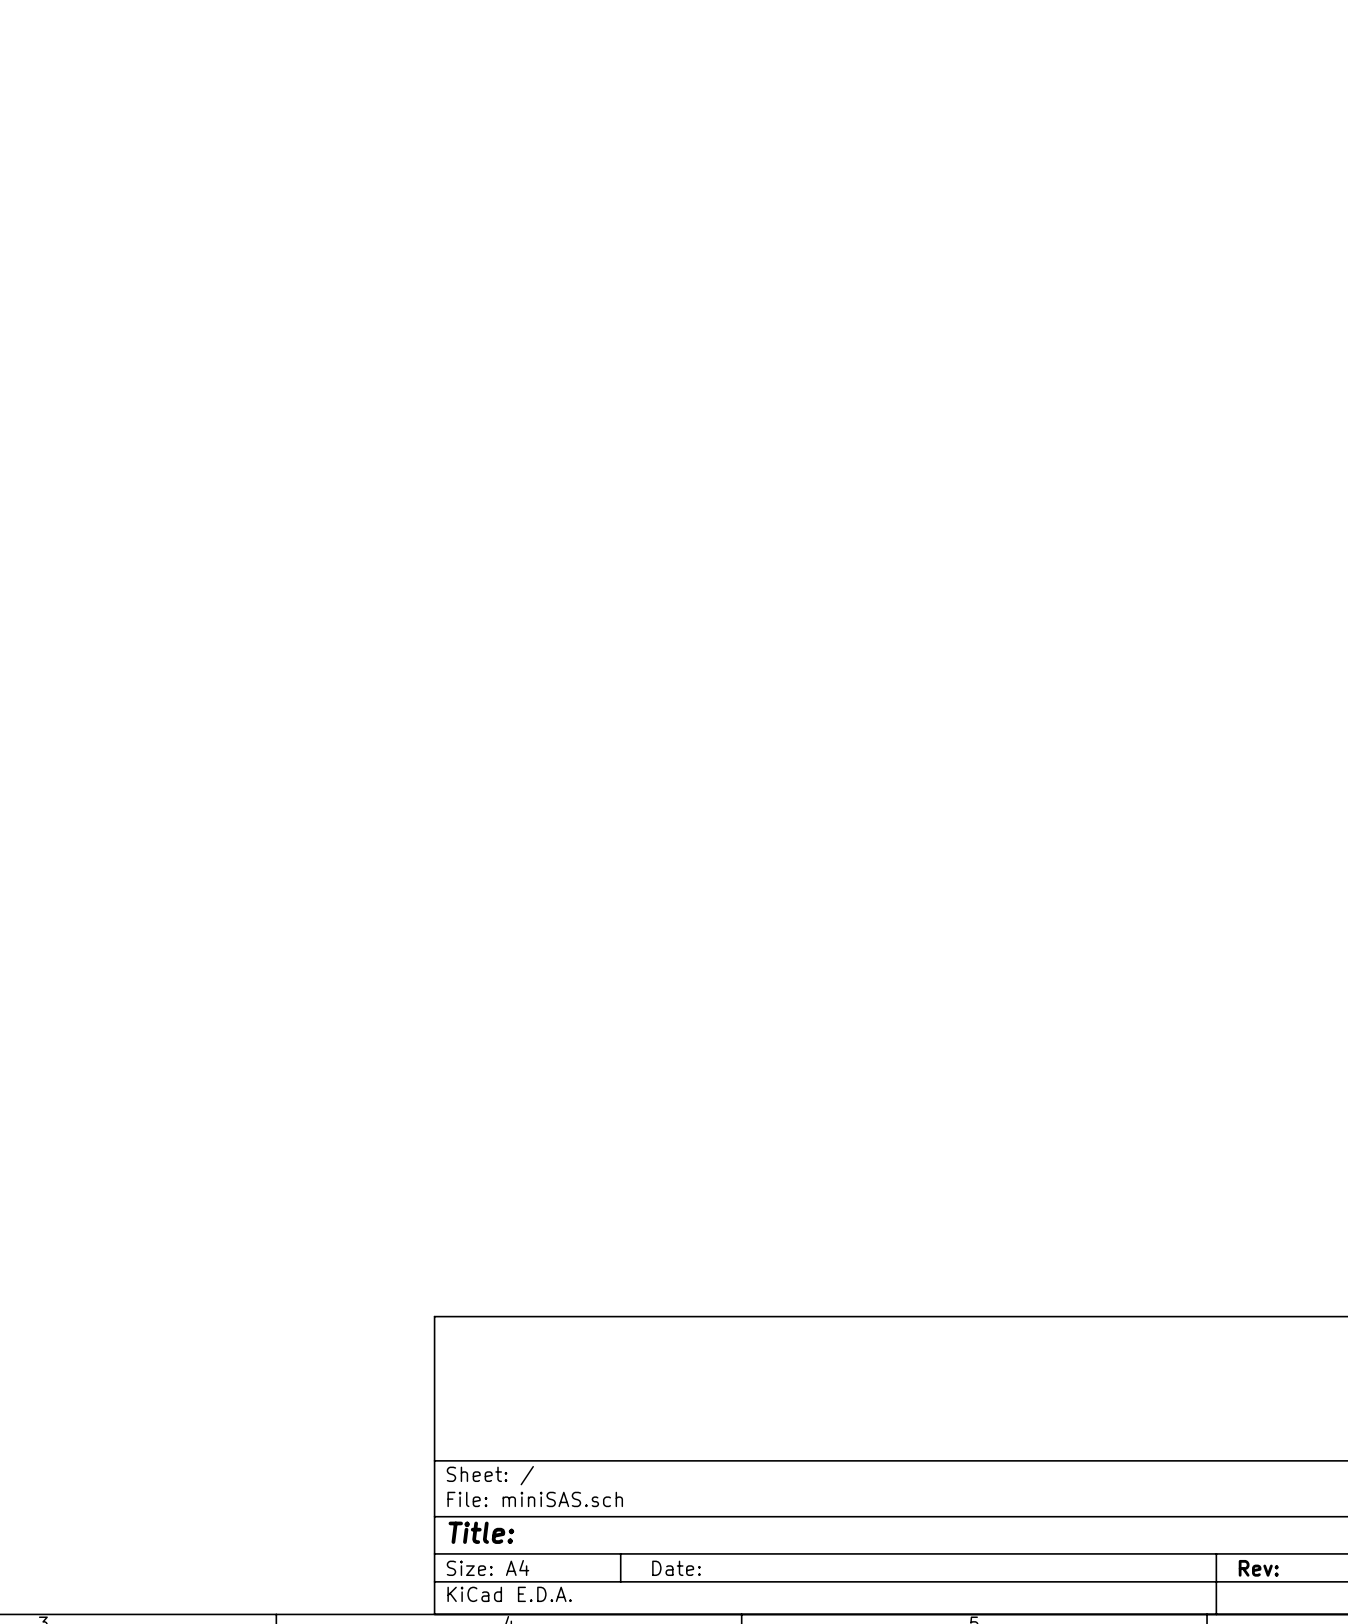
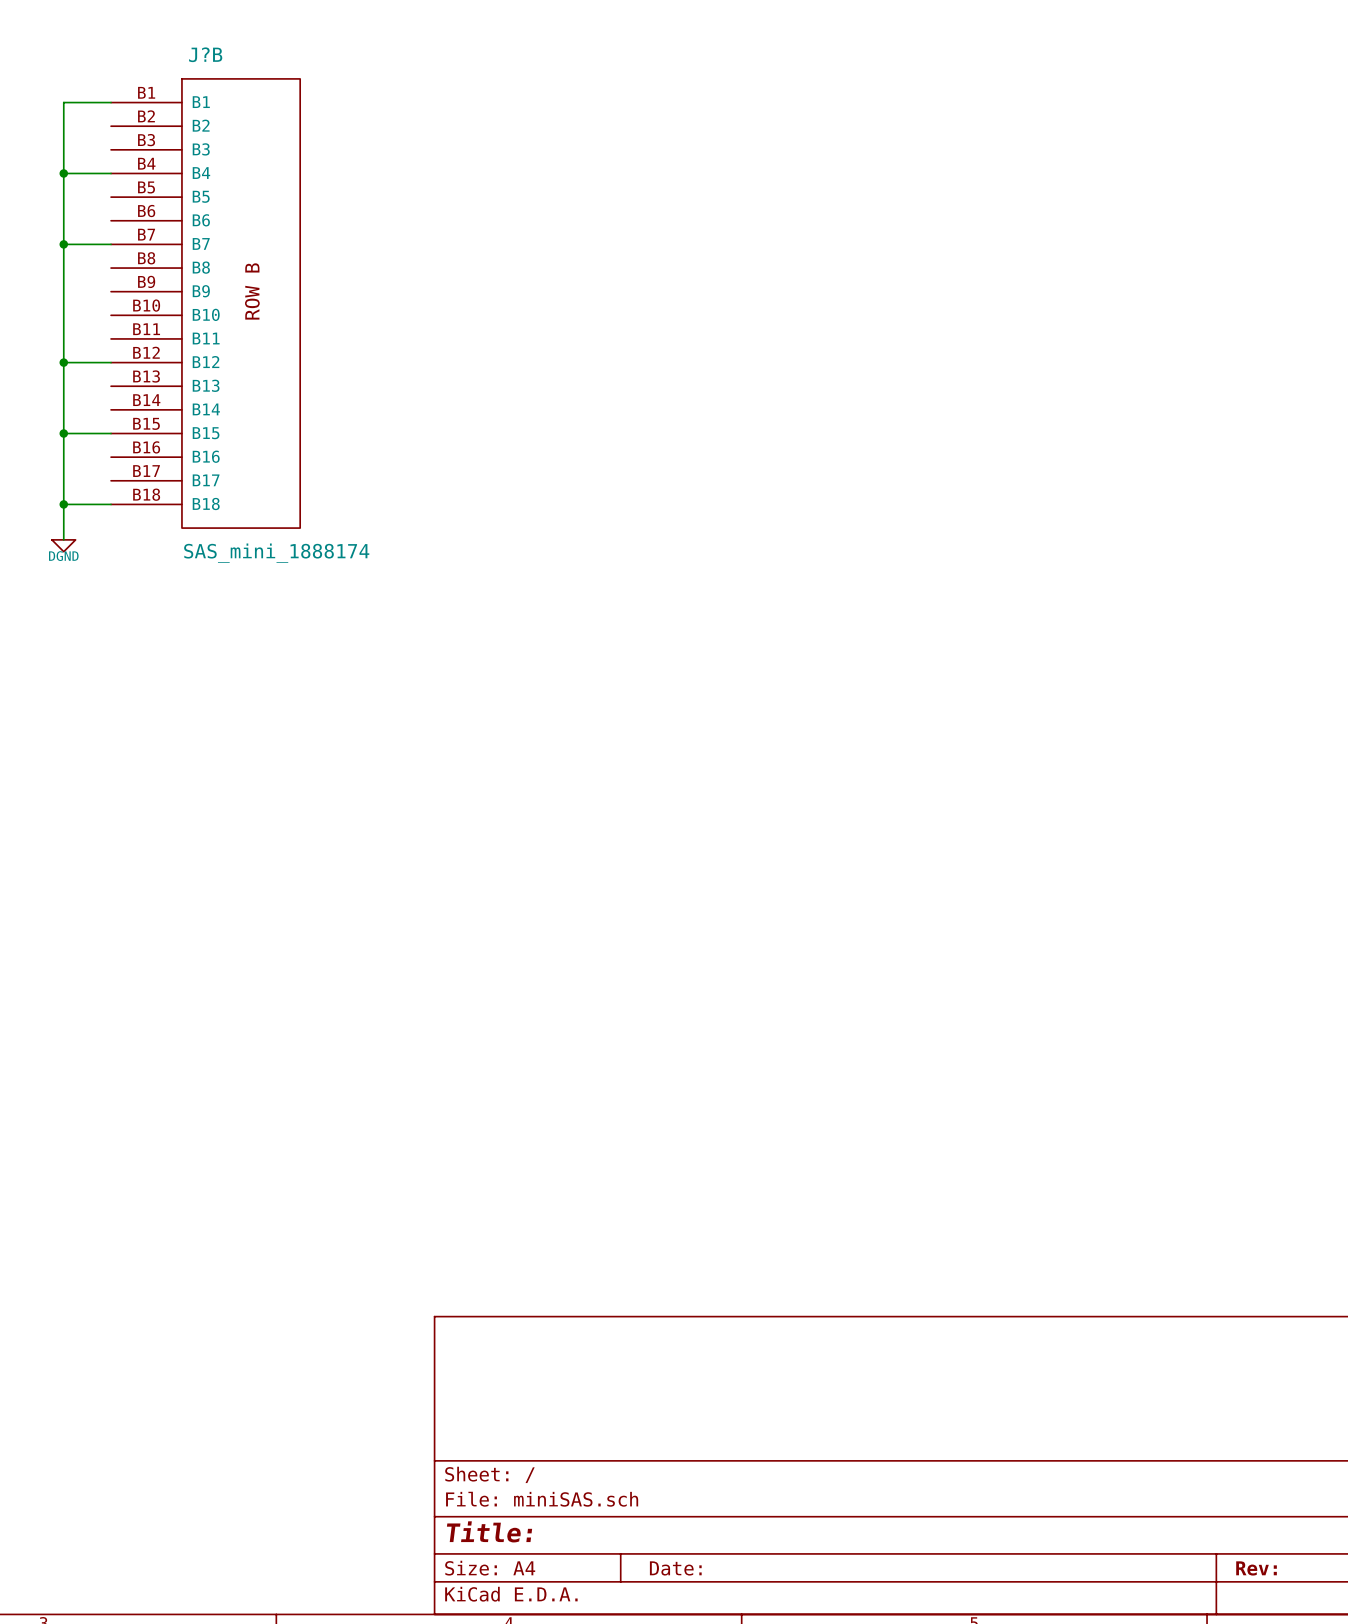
wire: none -> (111, 102) (63, 102) (63, 539)
wire: none -> (63, 173) (111, 173)
junction: none -> (63, 173)
wire: none -> (63, 244) (111, 244)
junction: none -> (63, 244)
J?B: none -> SAS_mini_1888174 (205, 303)
wire: none -> (63, 362) (111, 362)
junction: none -> (63, 362)
wire: none -> (63, 433) (111, 433)
junction: none -> (63, 433)
wire: none -> (63, 504) (111, 504)
junction: none -> (63, 504)
power symbol: none -> DGND (63, 545)

